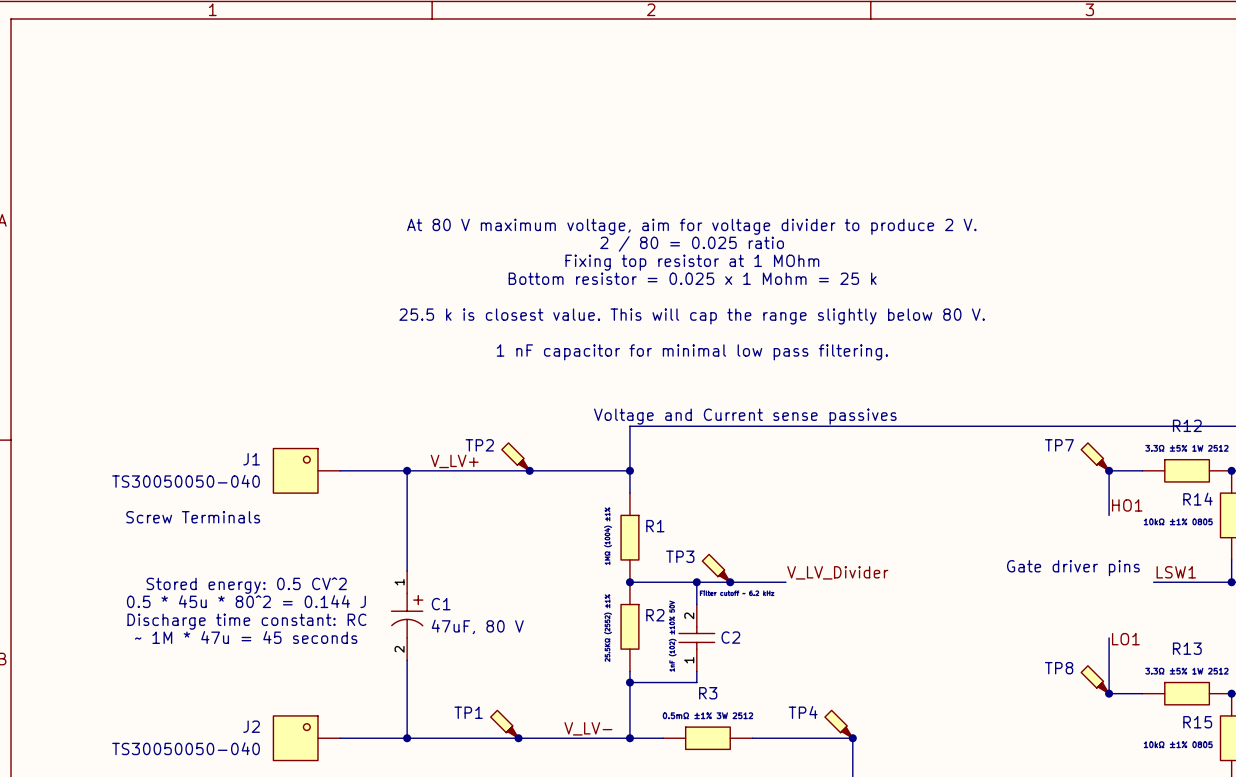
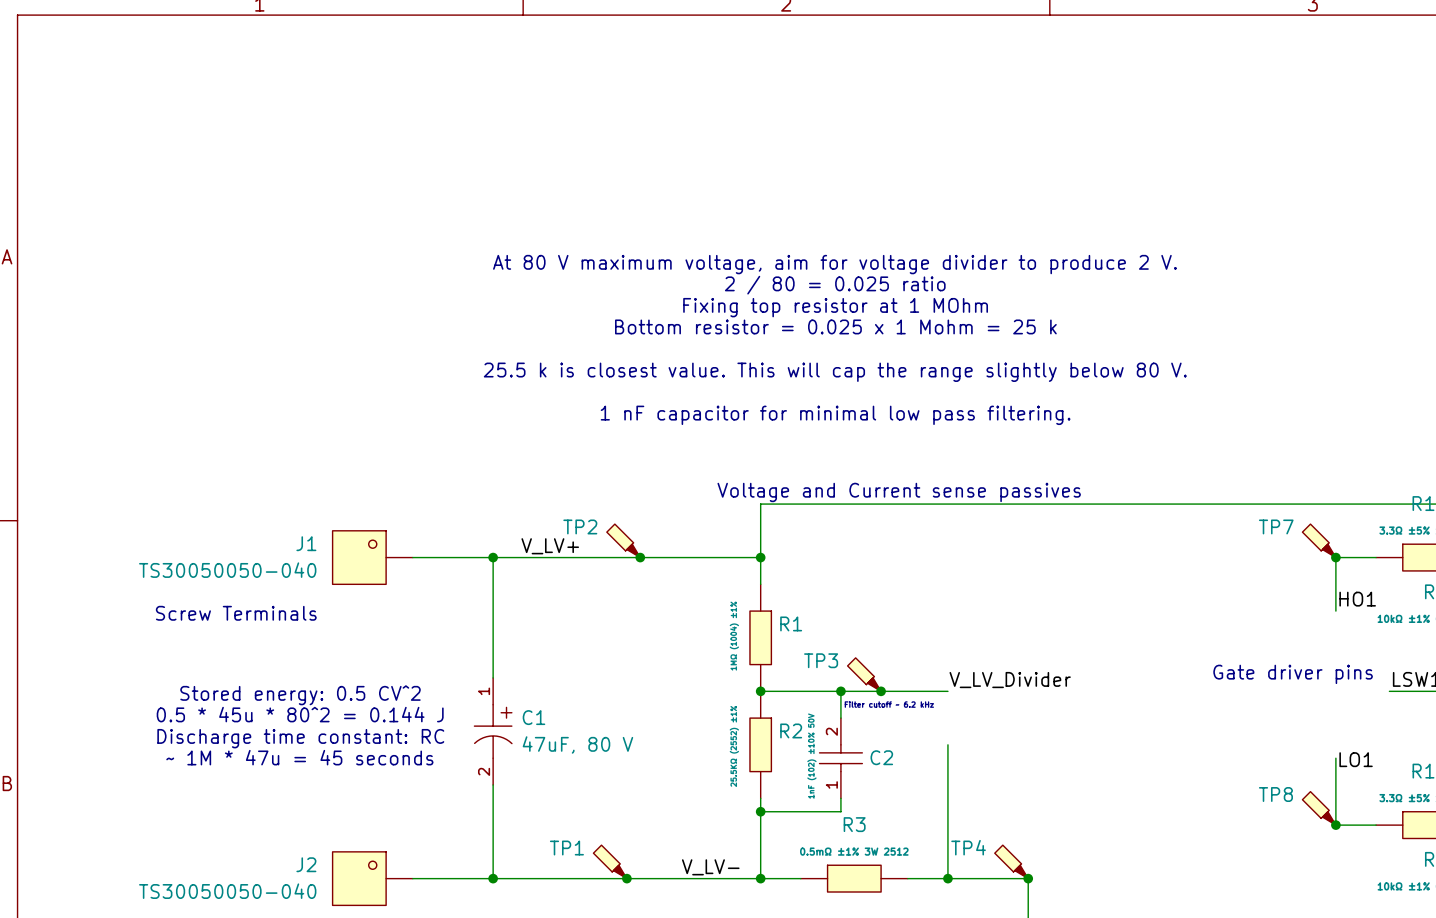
wire: none -> (947, 744) (947, 878)
junction: none -> (947, 878)

